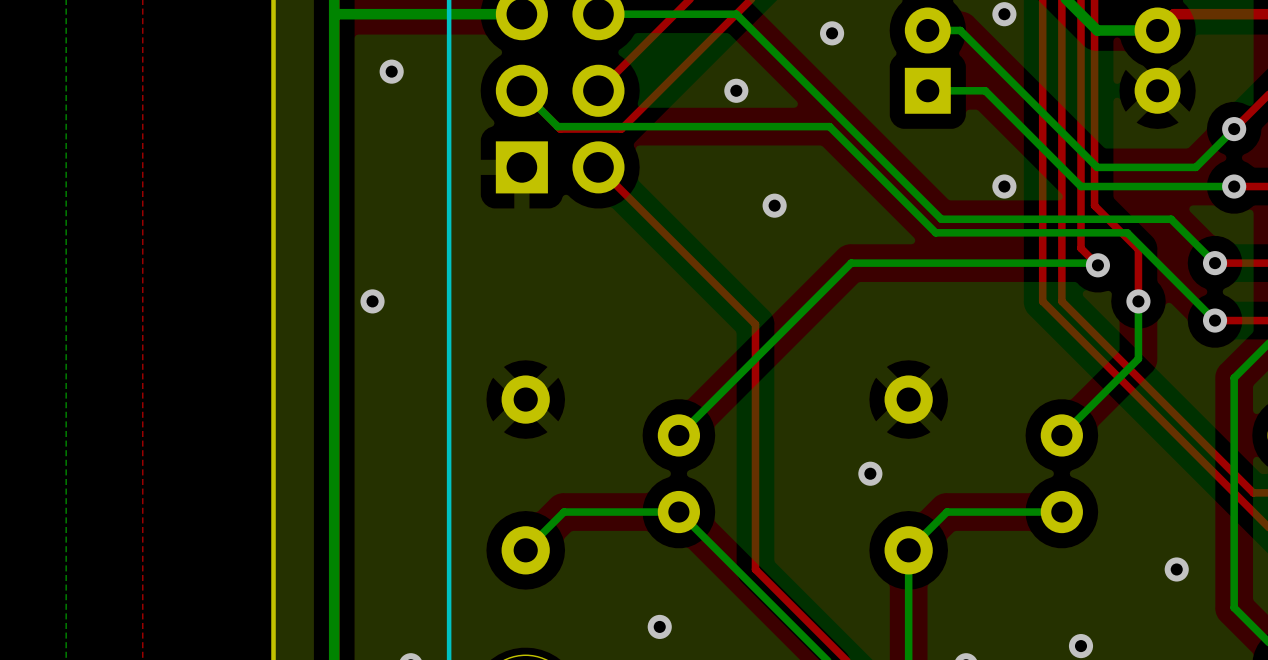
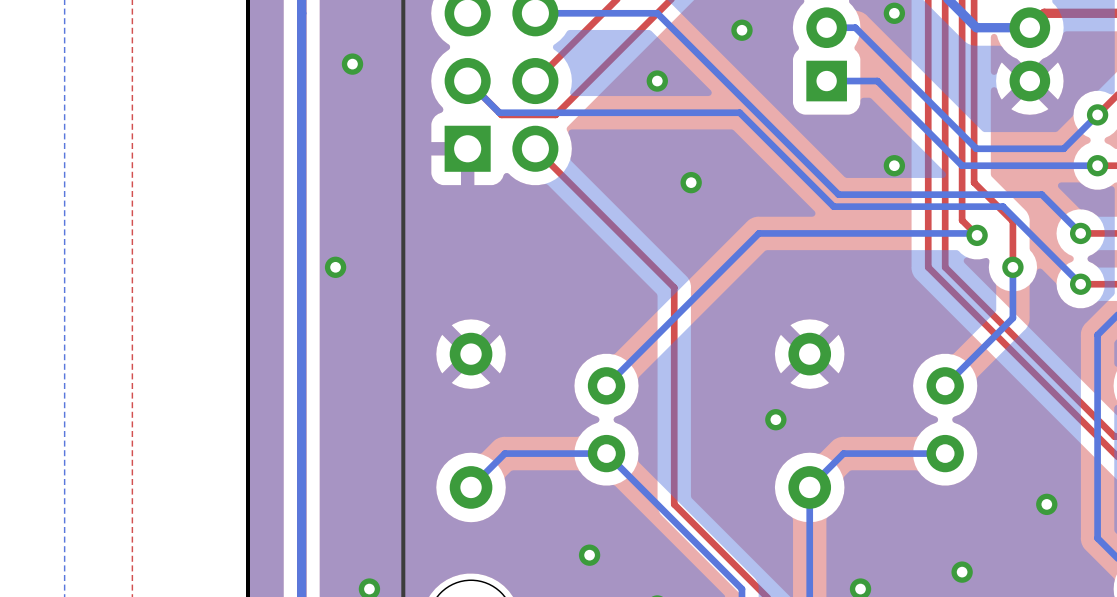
bottom track: (521, 14) (334, 14) -> none

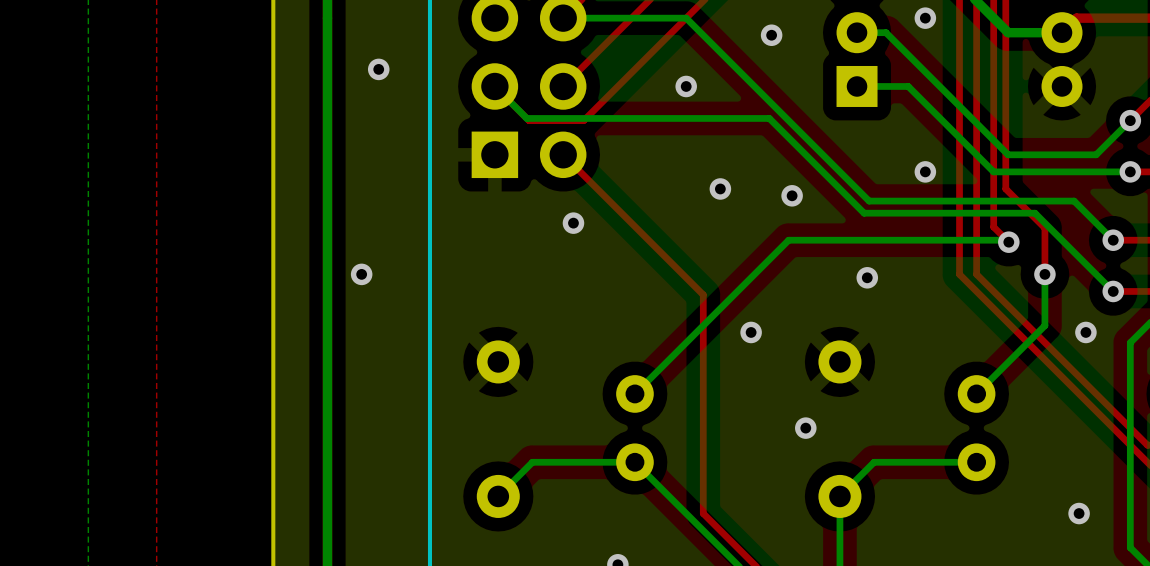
via: none -> (792, 195)
via: none -> (573, 223)
via: none -> (867, 277)
via: none -> (751, 332)
via: none -> (1085, 332)

